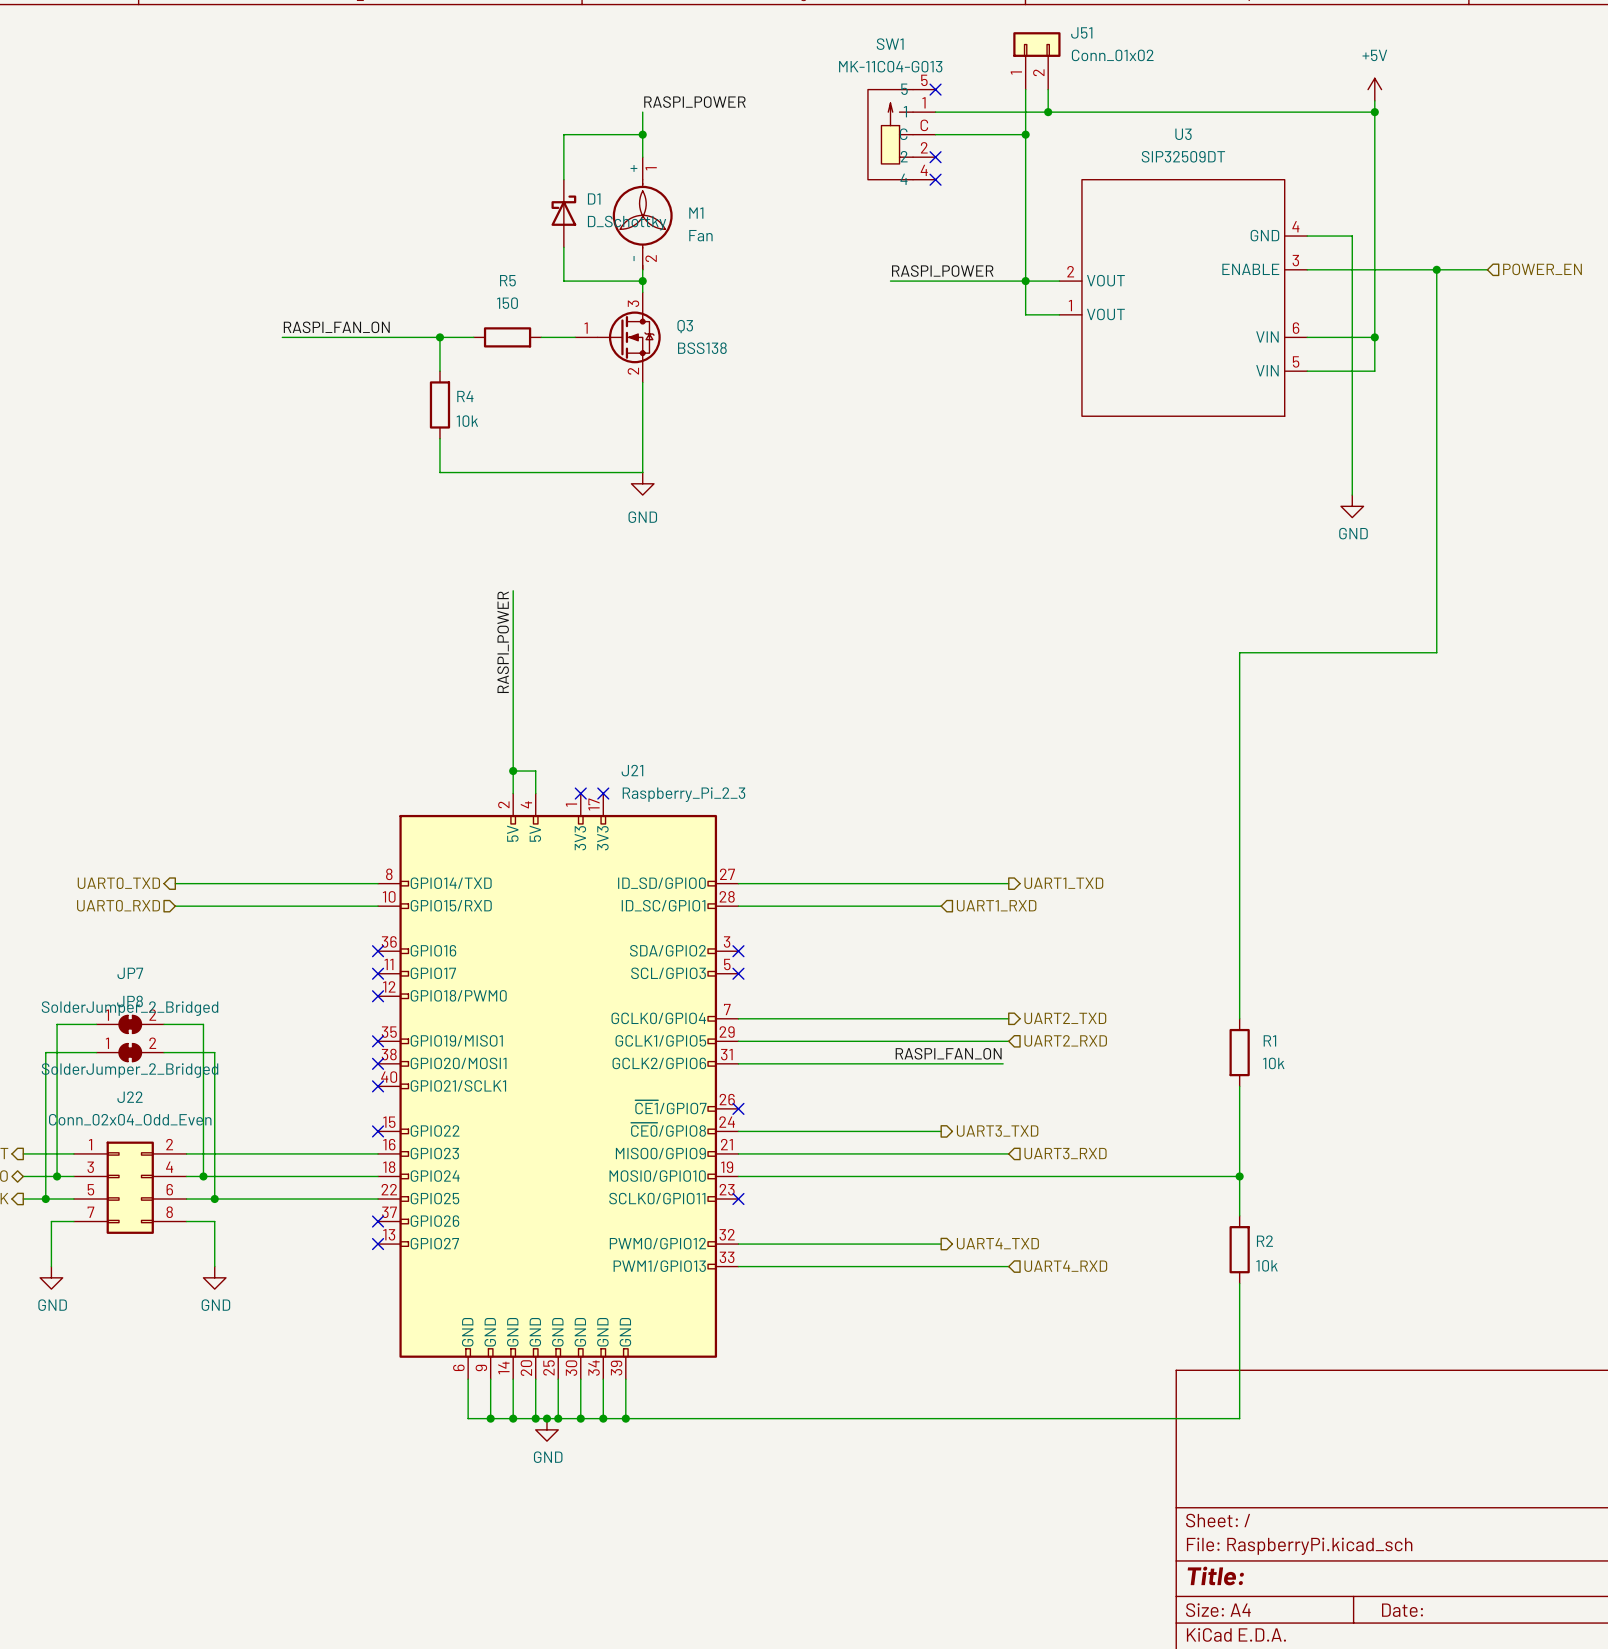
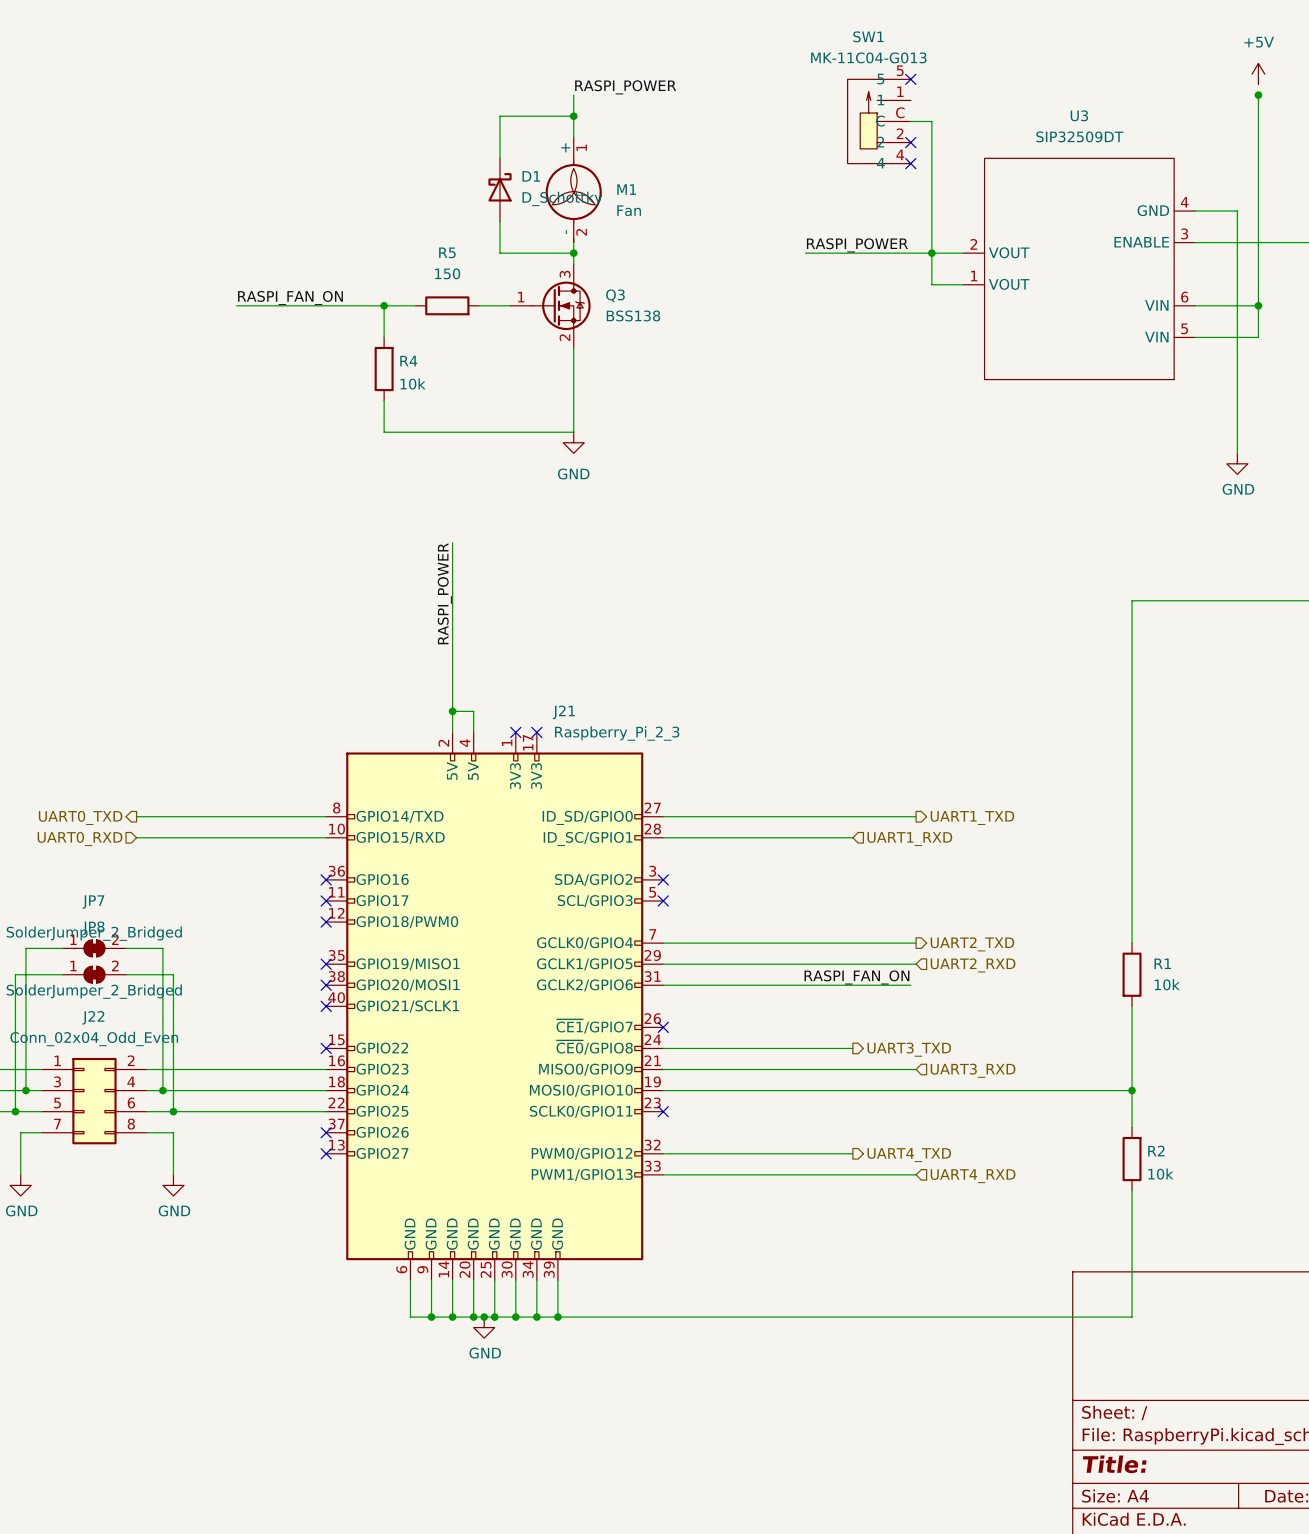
J51: Conn_01x02 (1036, 60) -> none
no-connect mark: (935, 89) -> none
wire: (1025, 89) (1025, 140) -> (910, 121) (931, 121)
wire: (1048, 89) (1048, 112) -> none
no-connect mark: none -> (910, 79)
wire: (1374, 100) (1374, 112) (935, 112) -> none
junction: (1048, 112) -> none
SW1 position: (901, 134) -> (879, 121)
wire: (935, 134) (1025, 134) -> none
junction: (1025, 134) -> none
no-connect mark: (935, 157) -> none
no-connect mark: none -> (910, 142)
no-connect mark: (935, 179) -> none
no-connect mark: none -> (910, 163)

